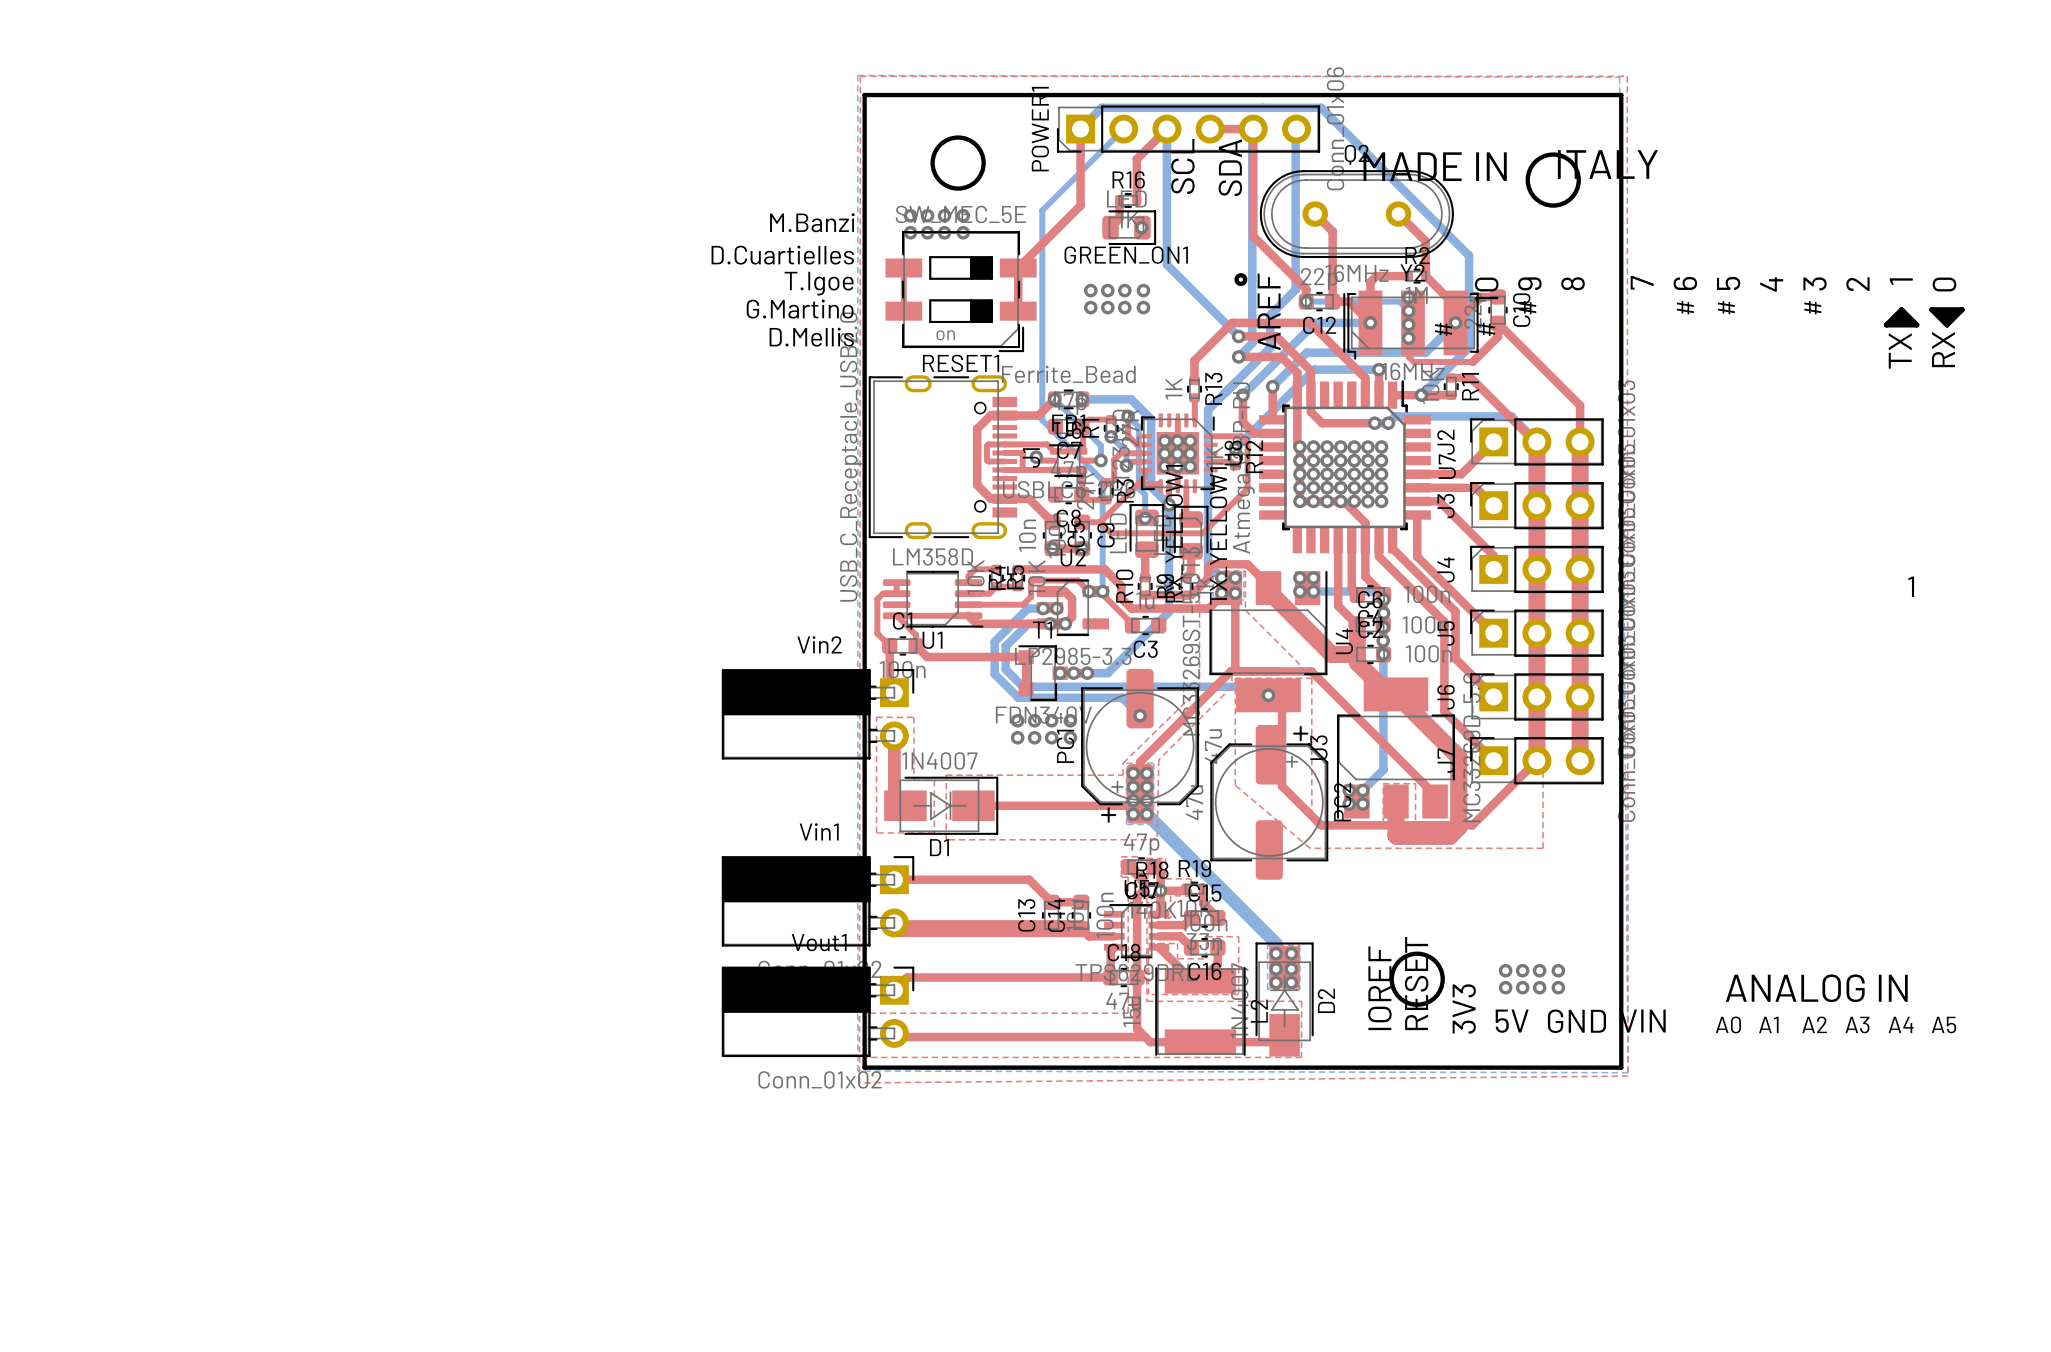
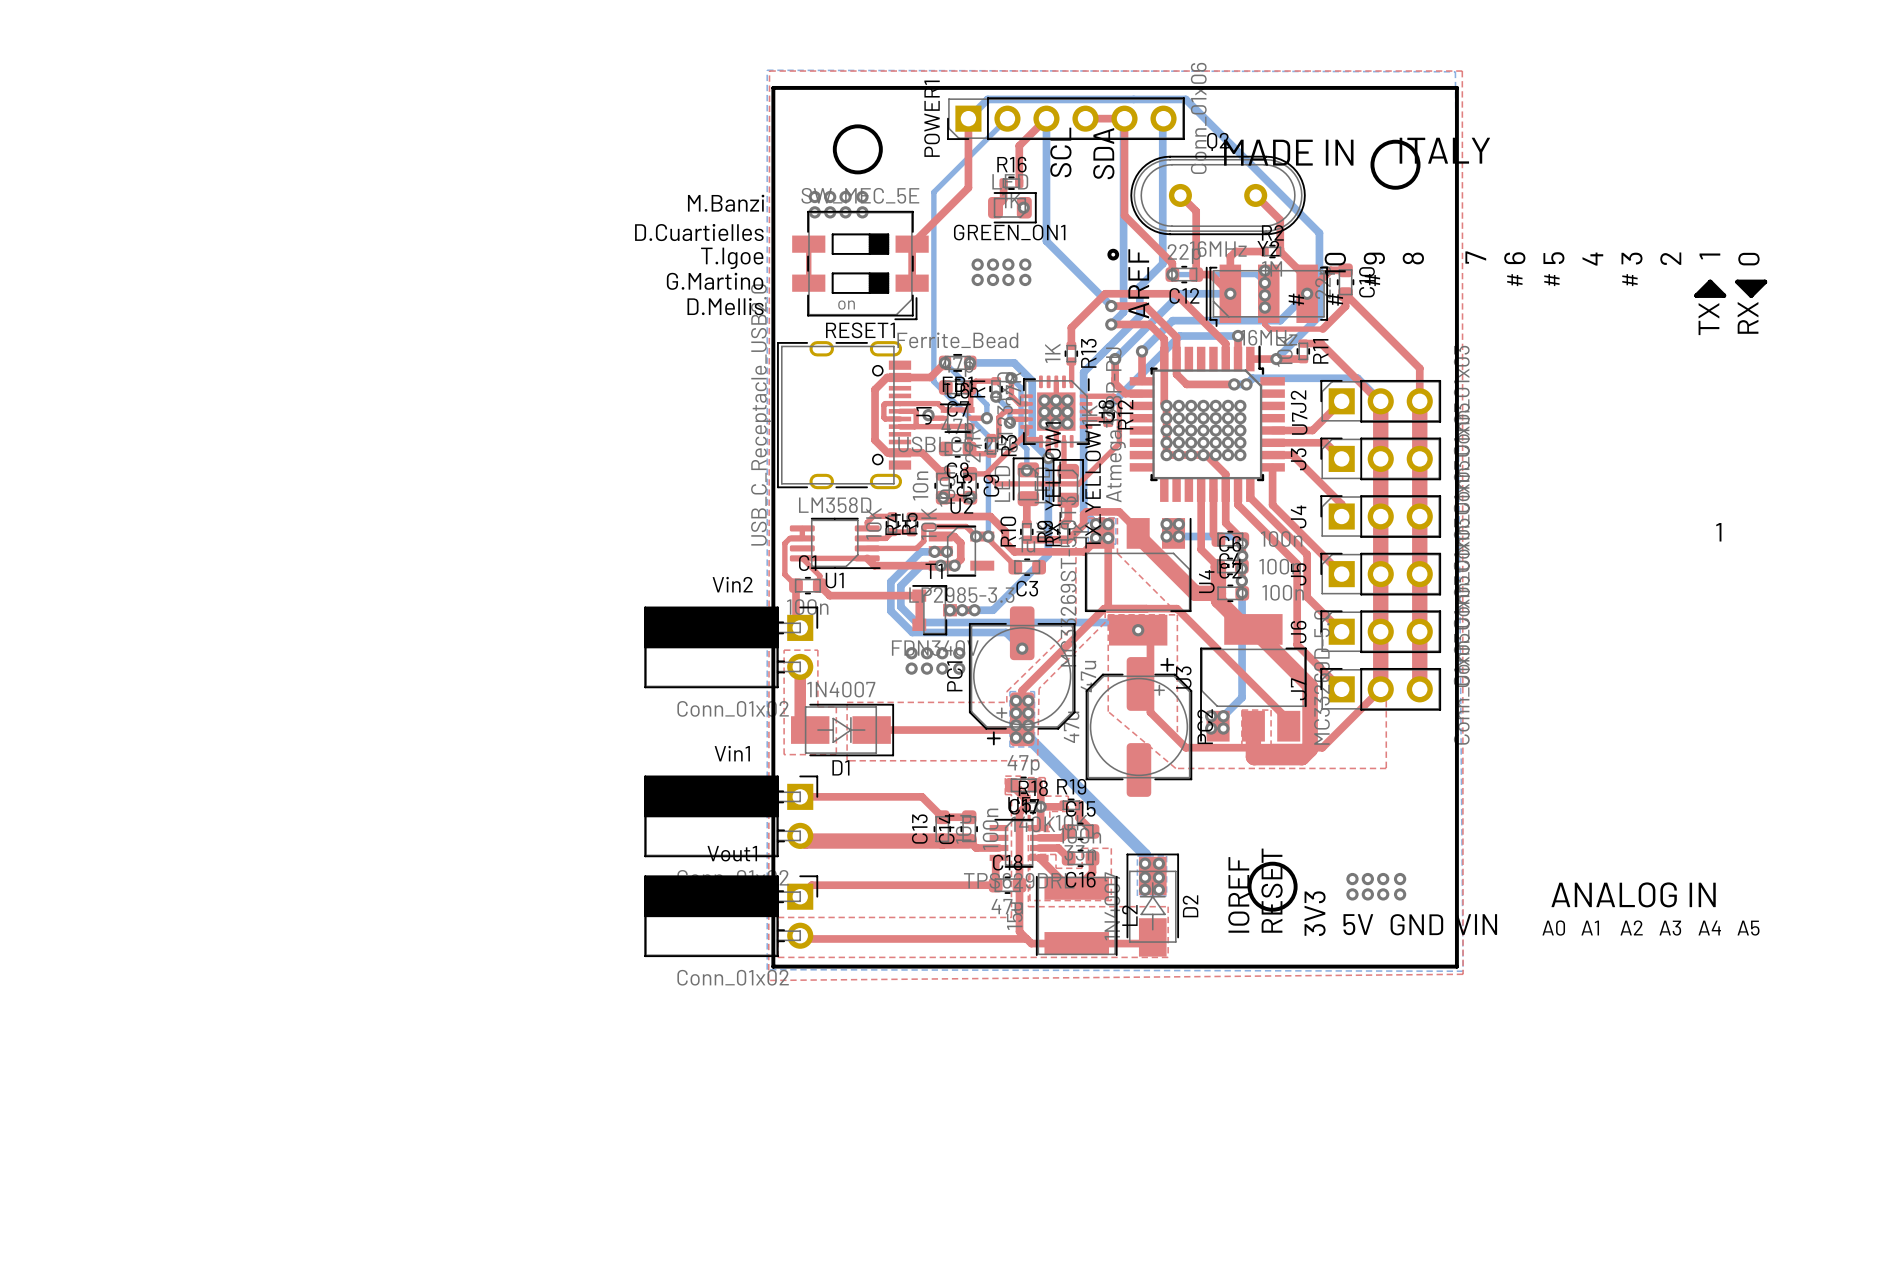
Vin2 value: none -> Conn_01x02 (733, 708)

